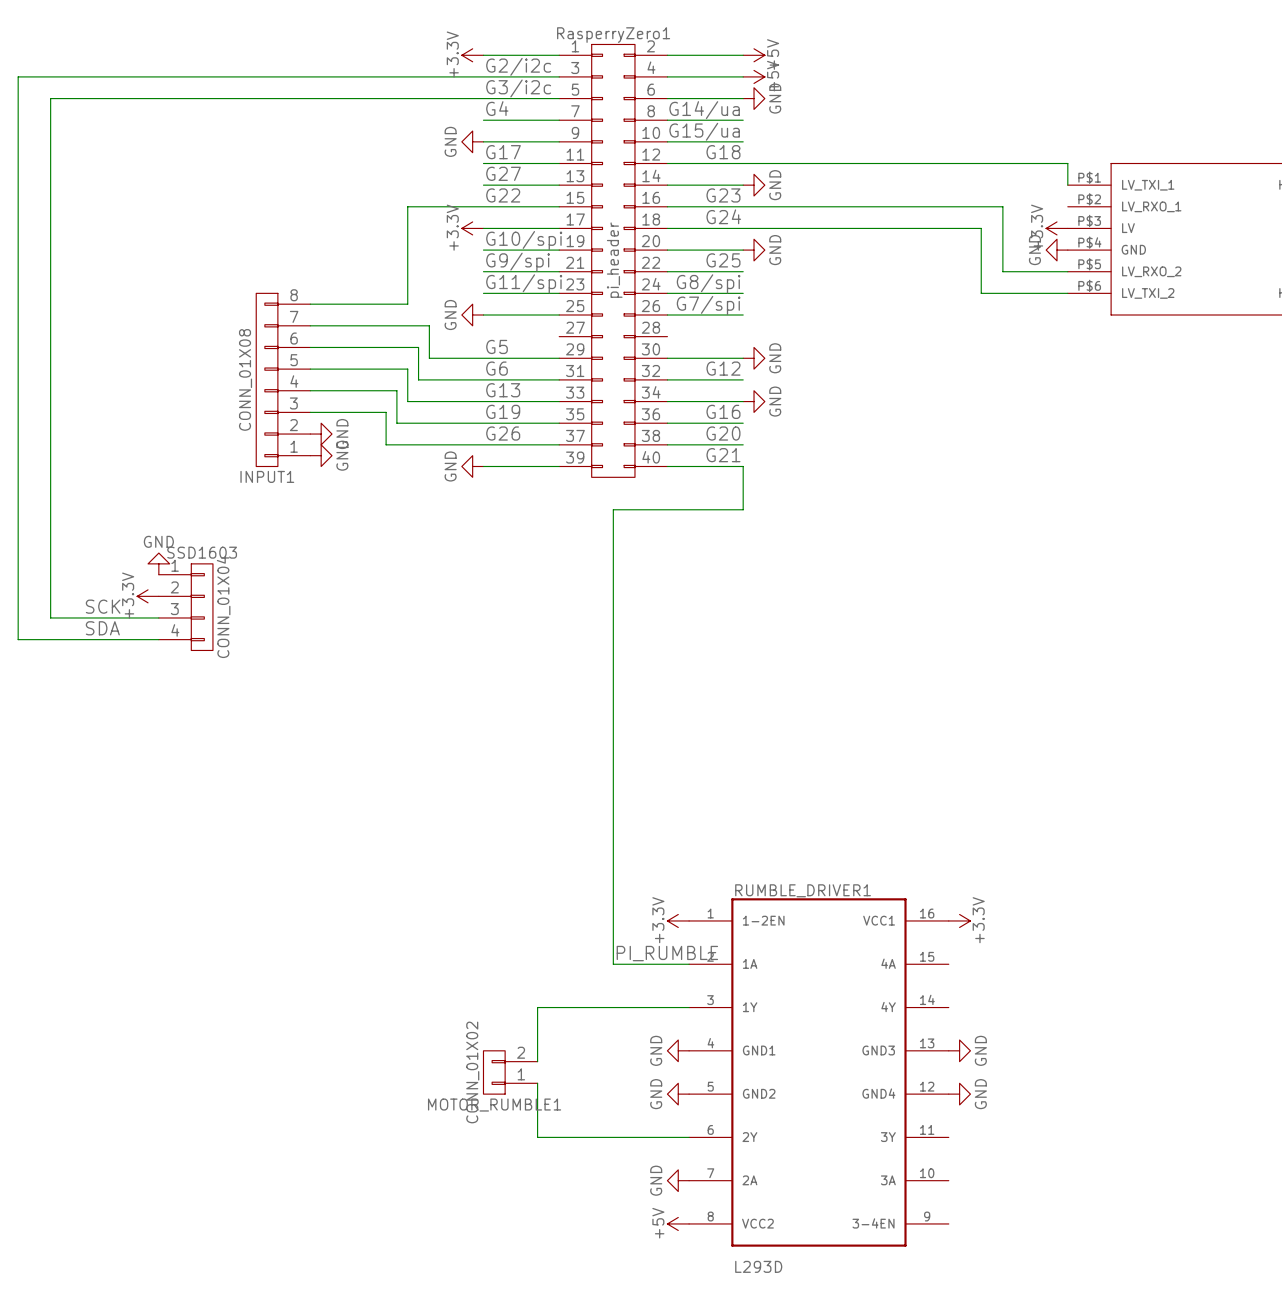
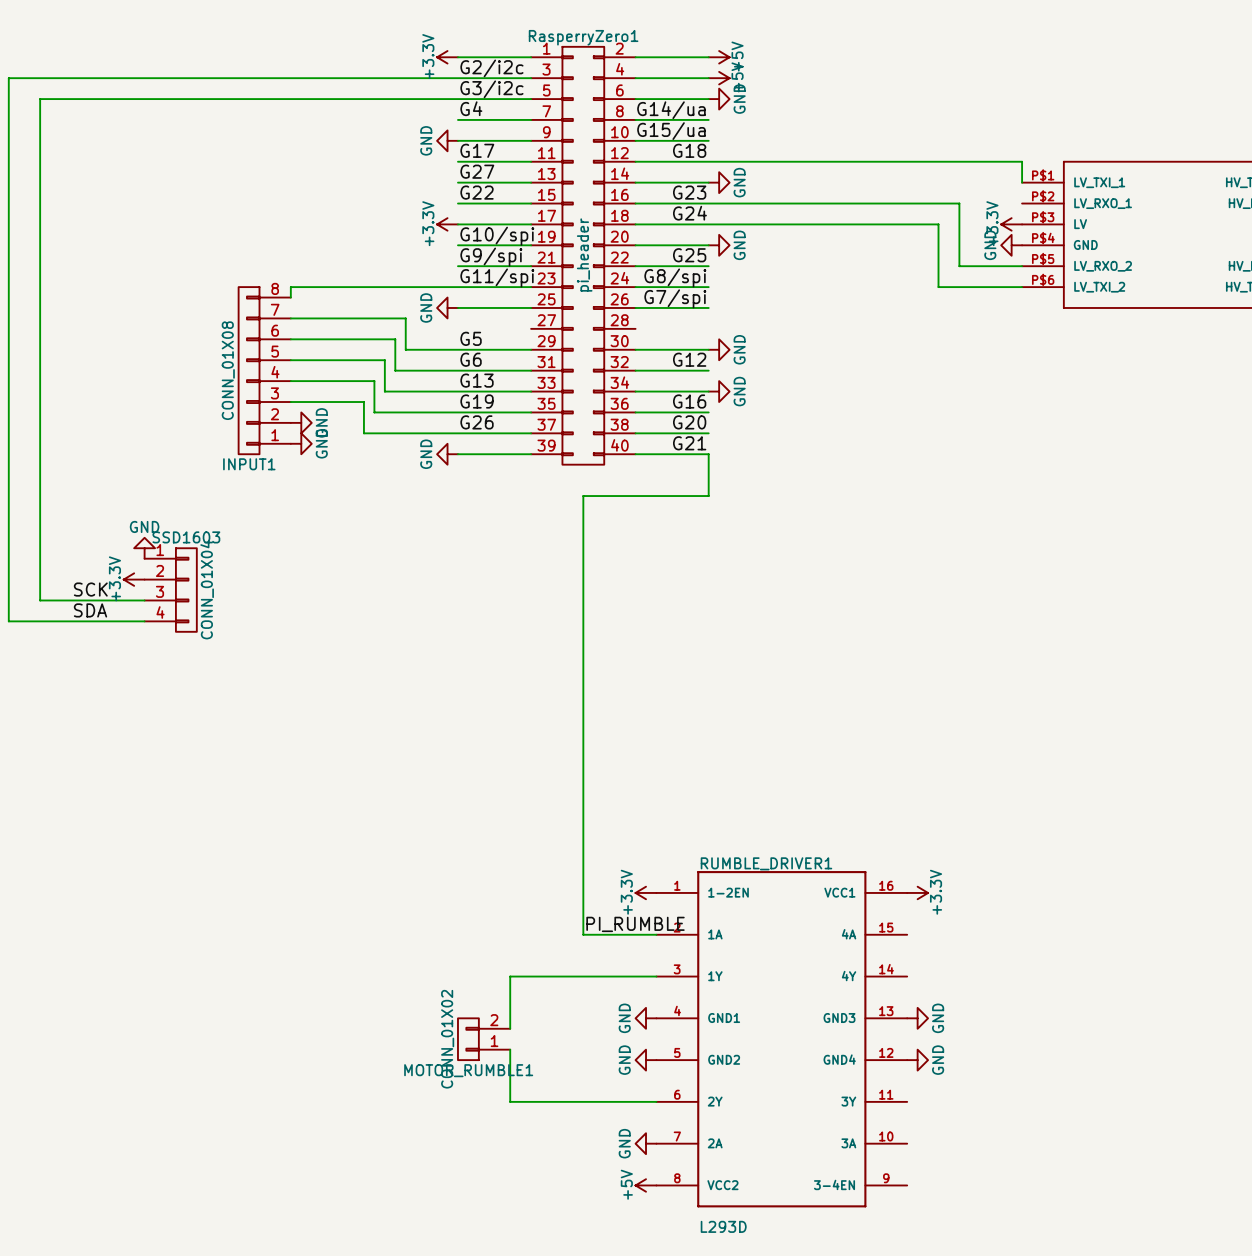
wire: (483, 206) (407, 206) (407, 304) (310, 304) -> (457, 287) (290, 287) (290, 297)

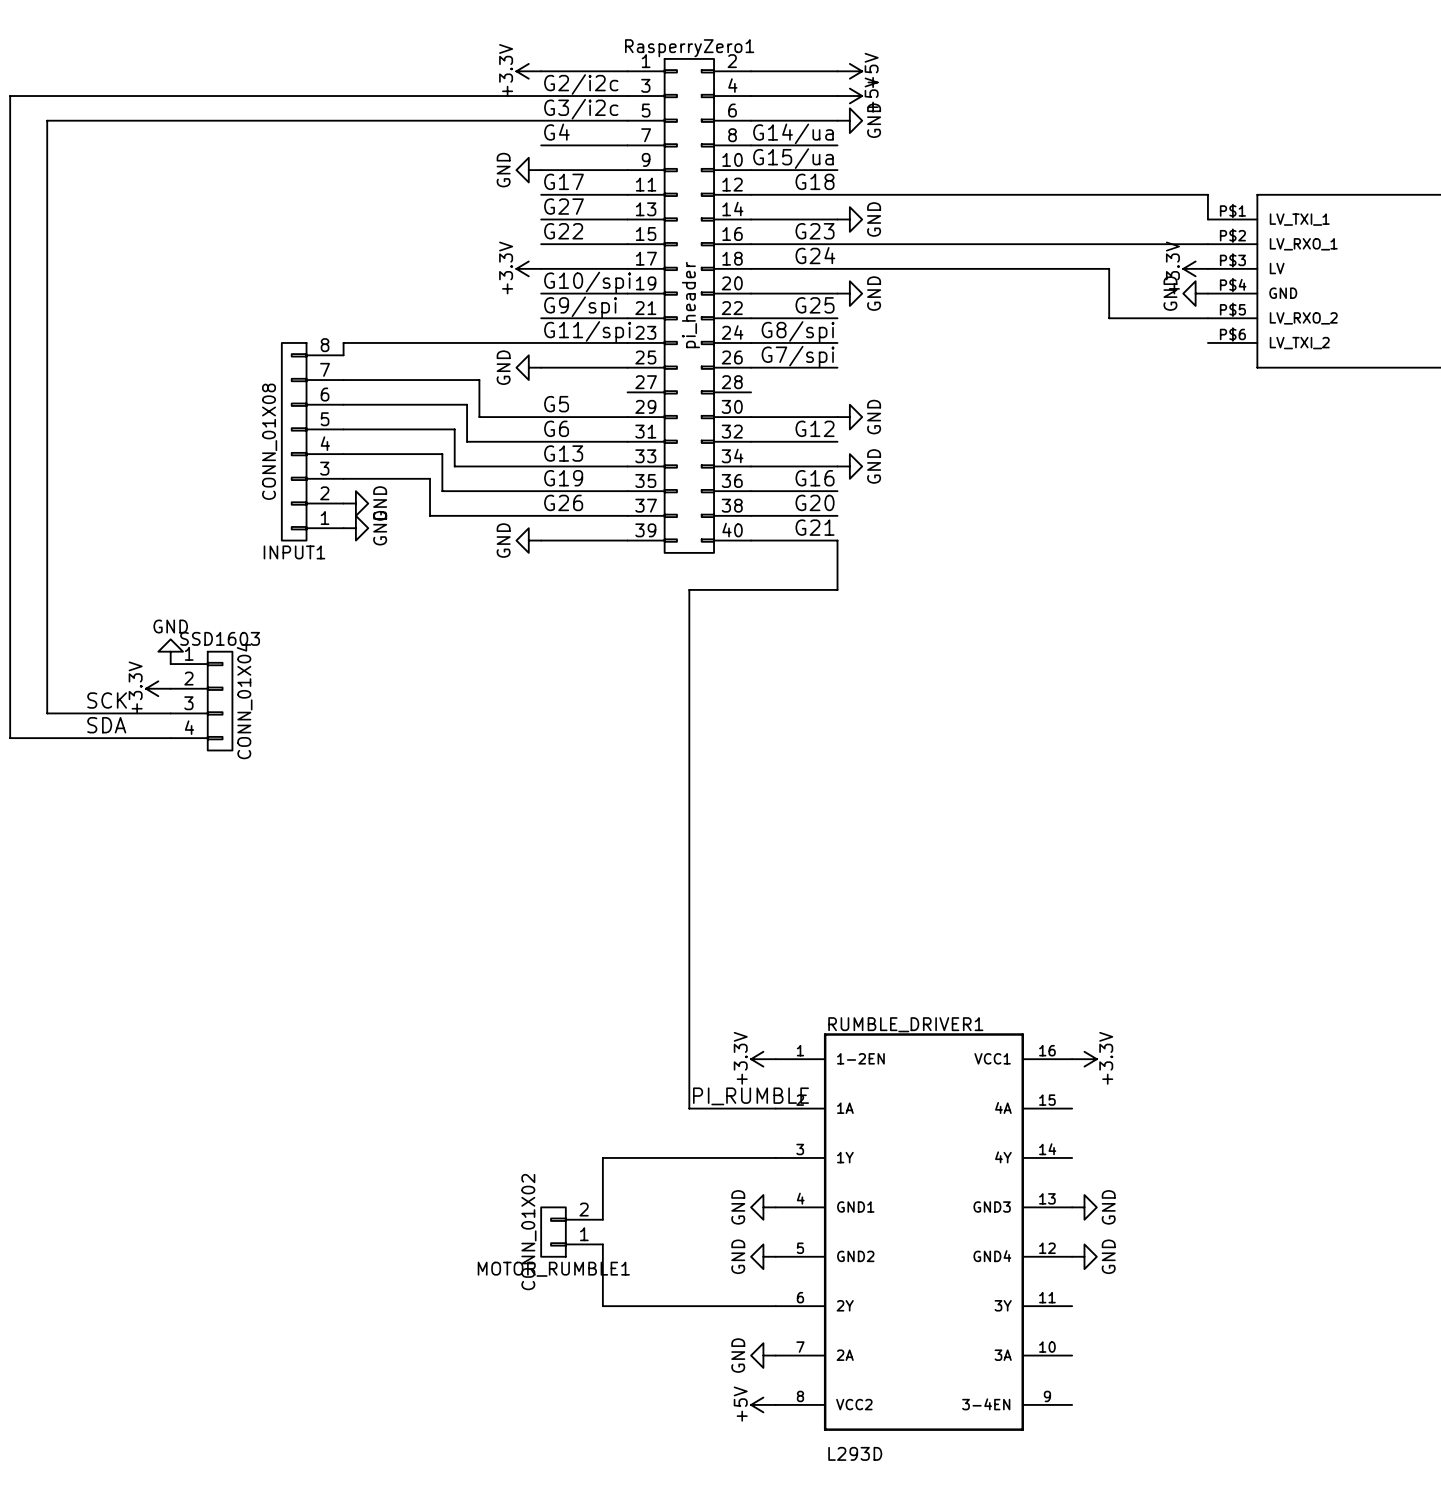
wire: (959, 203) (959, 266) -> (1109, 318) (1133, 318)
wire: none -> (1133, 244) (1207, 244)
wire: (938, 266) (938, 287) (1022, 287) -> none

